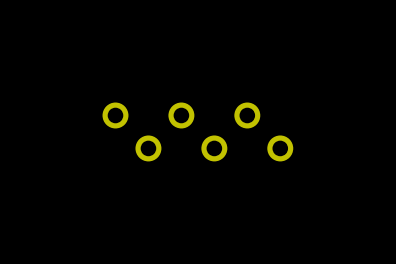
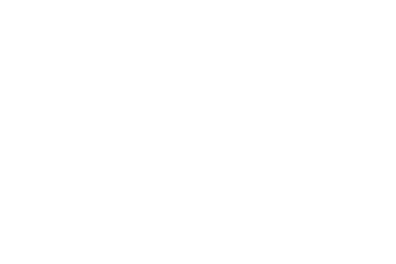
part: (197, 131) -> none

